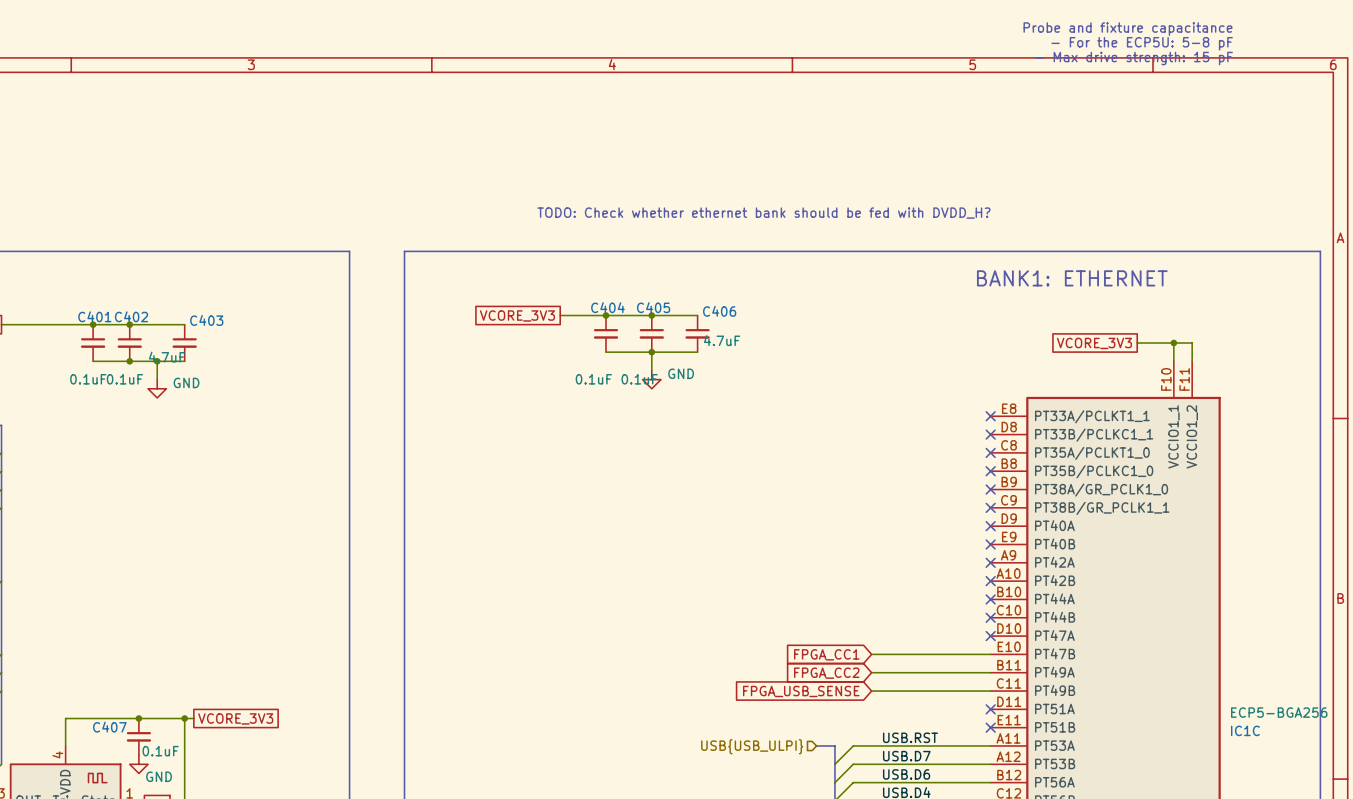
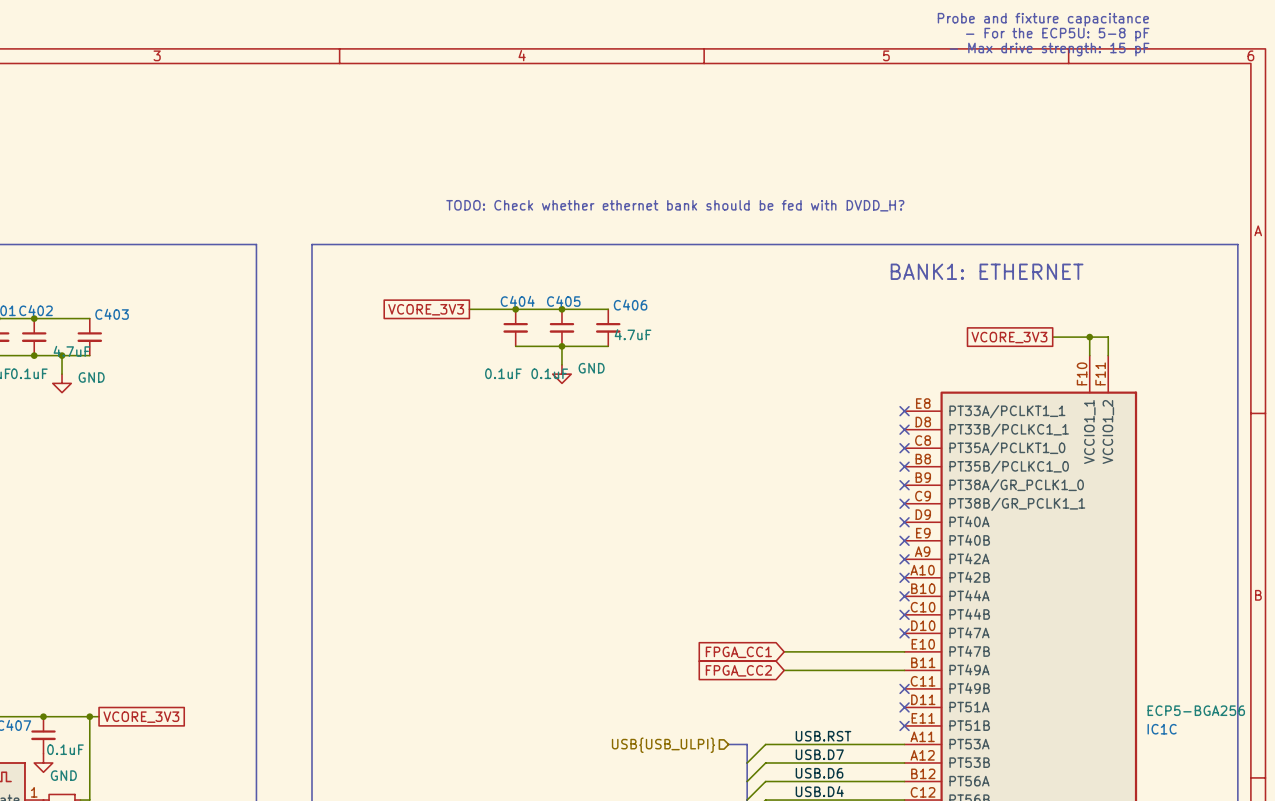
global label: FPGA_USB_SENSE (801, 691) -> none
wire: (871, 691) (990, 691) -> none
no-connect mark: none -> (904, 688)

